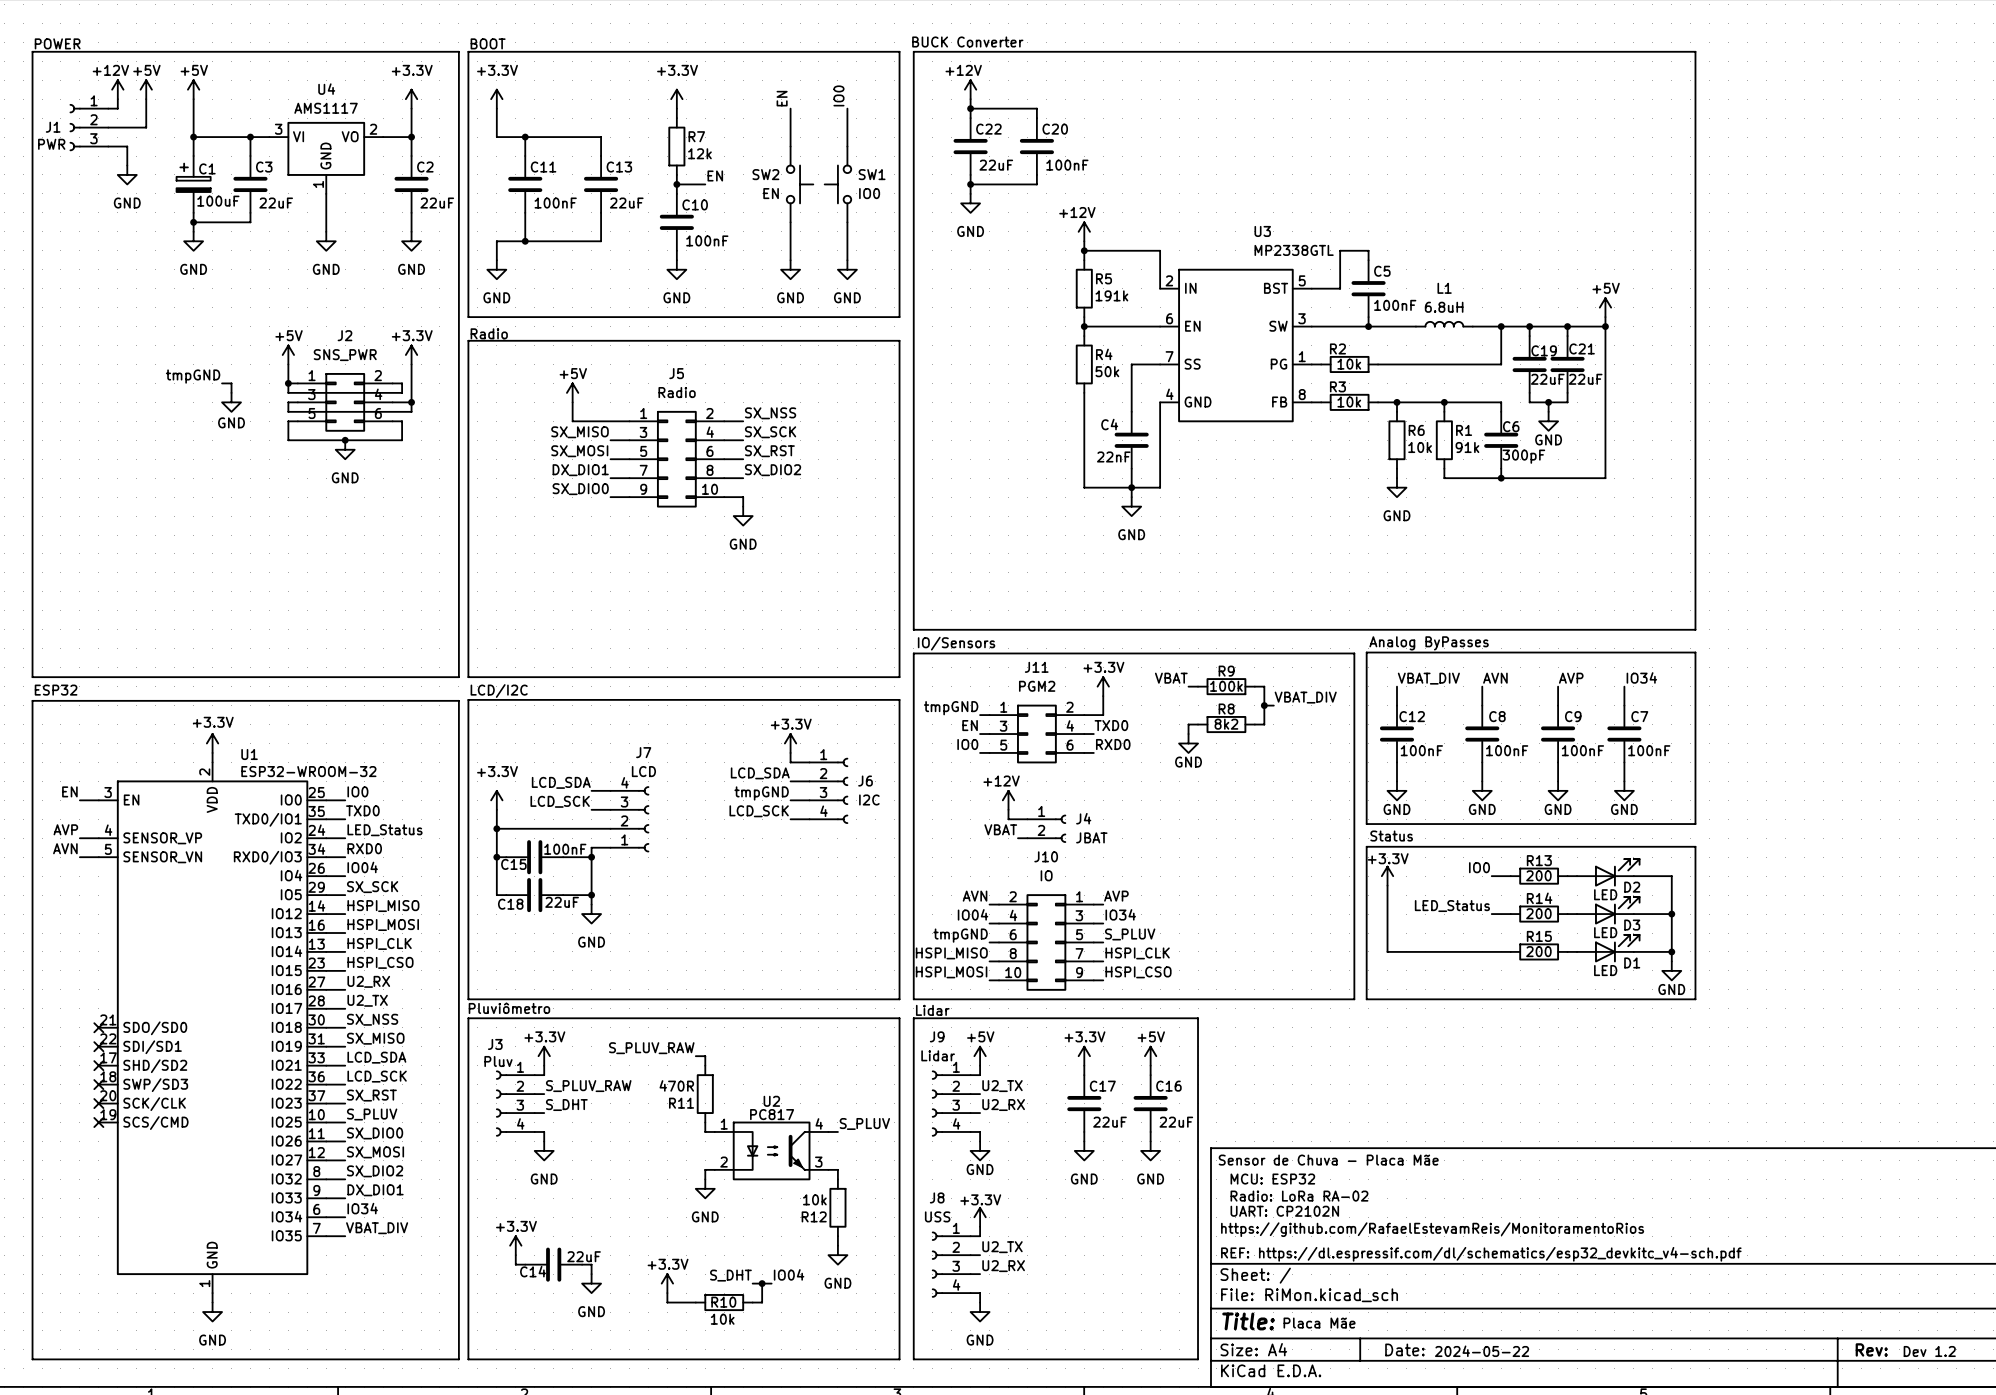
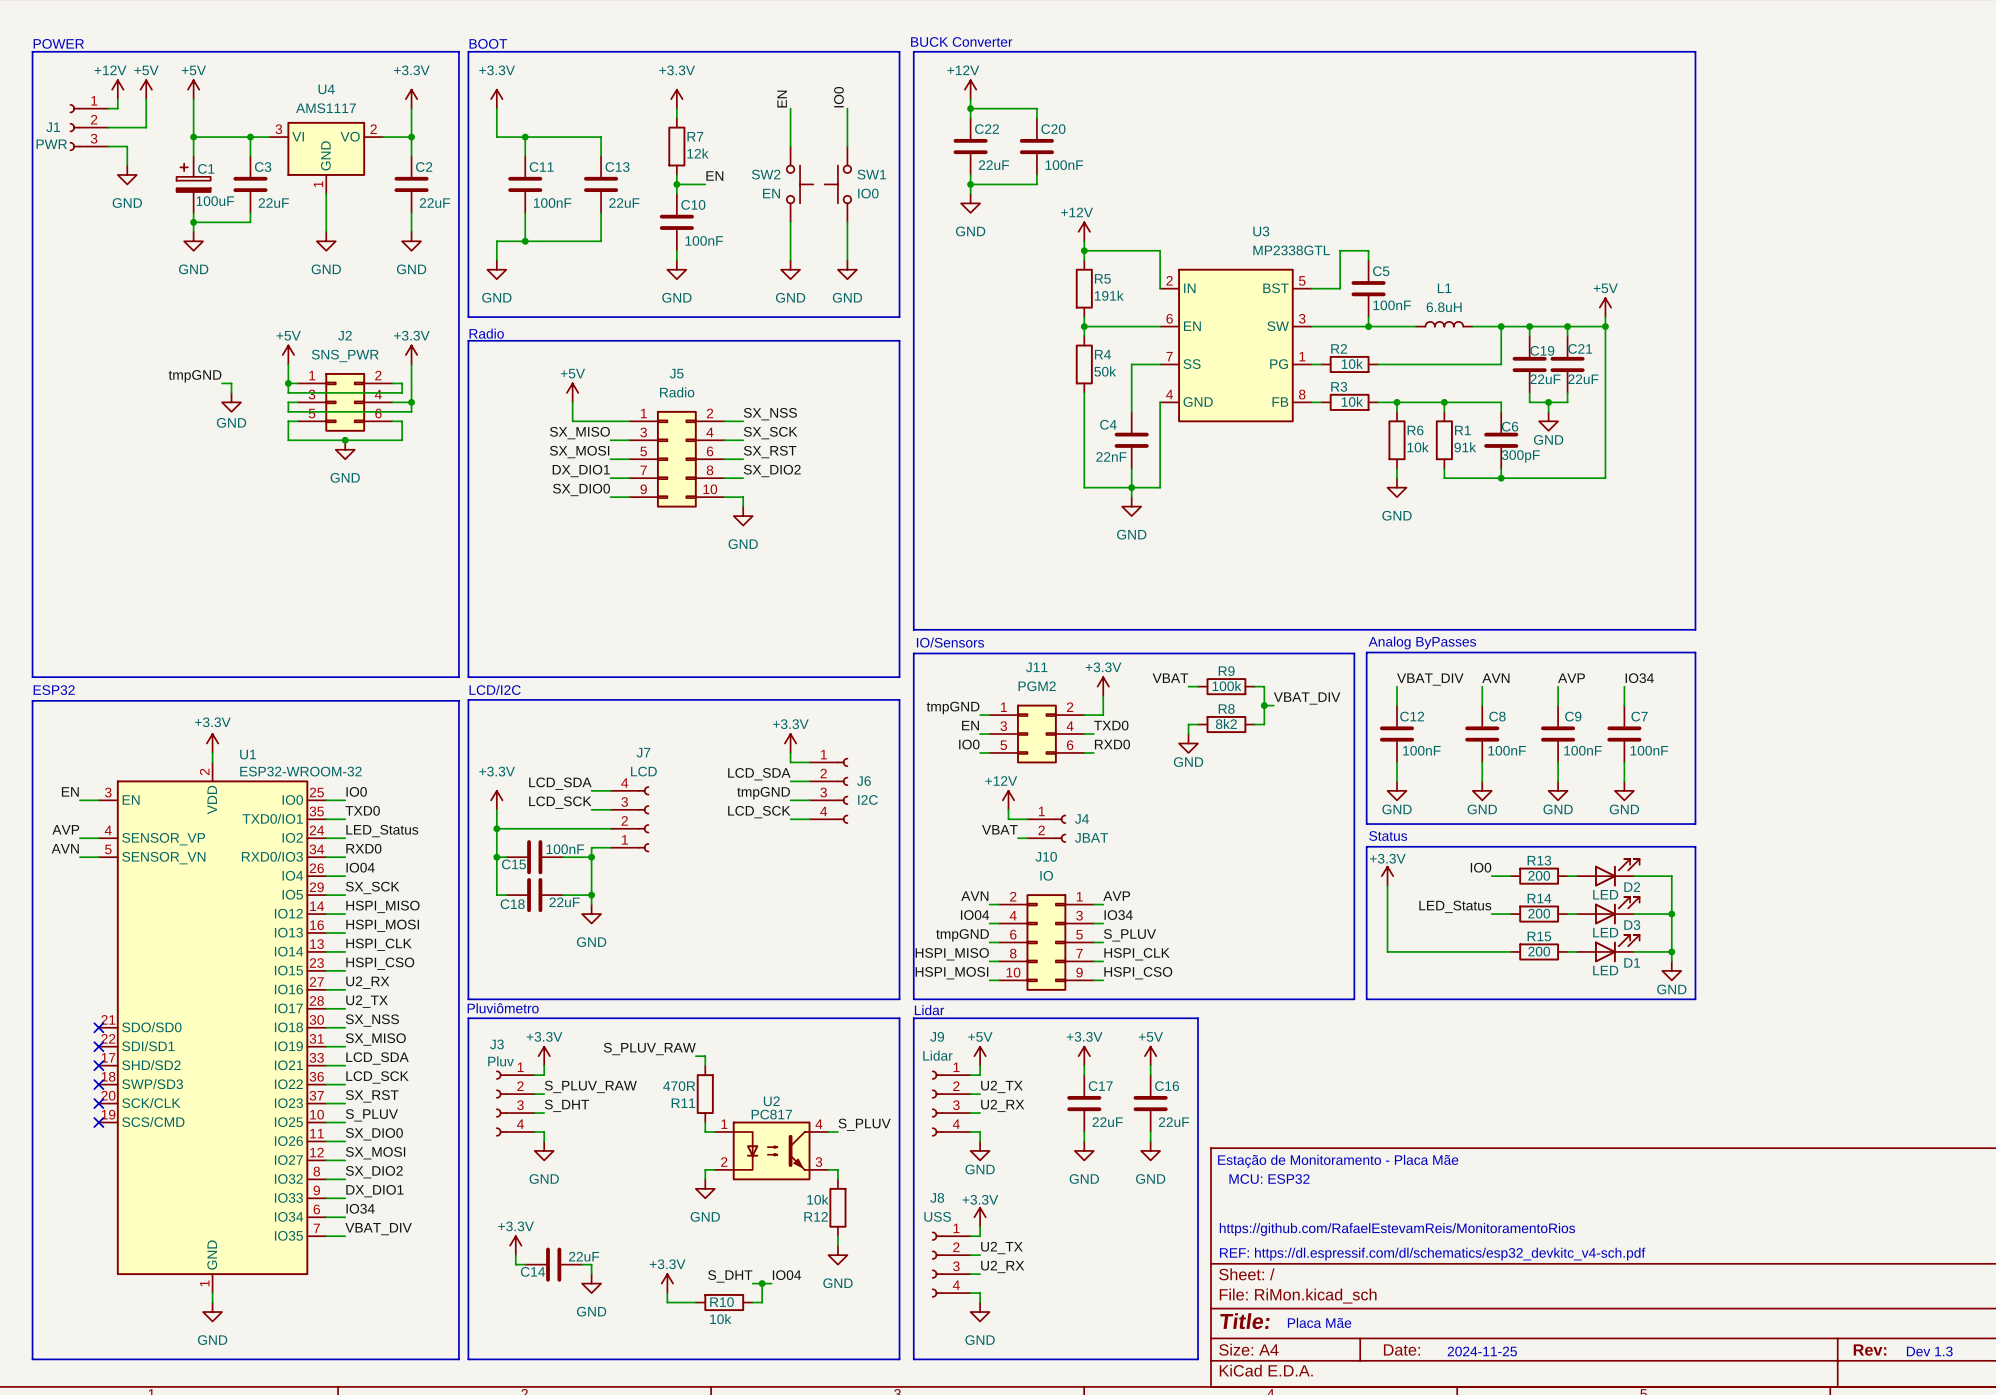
text: Sensor de Chuva - Placa Mãe (1328, 1160) -> Estação de Monitoramento - Placa Mãe (1338, 1161)
text: Radio: LoRa RA-02 (1299, 1196) -> none
text: UART: CP2102N (1284, 1211) -> none
text: 2024-05-22 (1482, 1351) -> 2024-11-25 (1482, 1351)
text: Dev 1.2 (1929, 1351) -> Dev 1.3 (1929, 1351)

